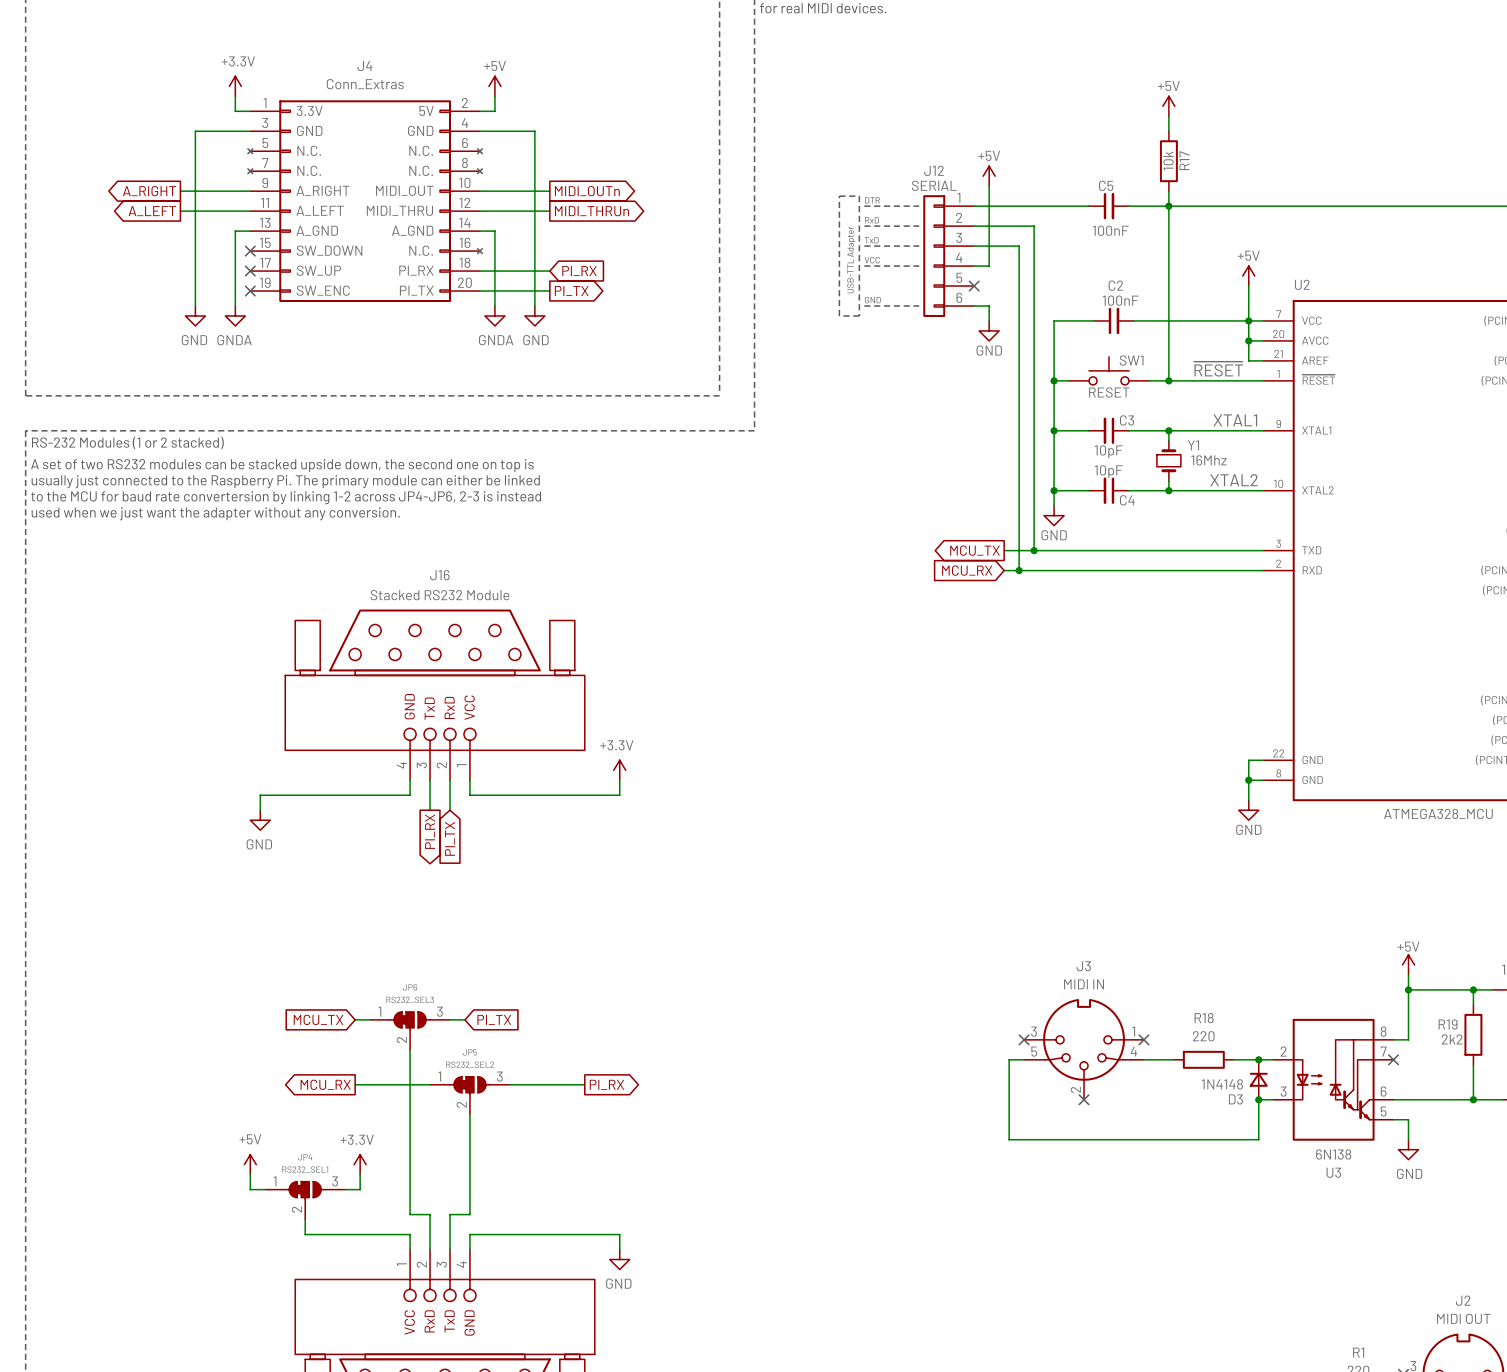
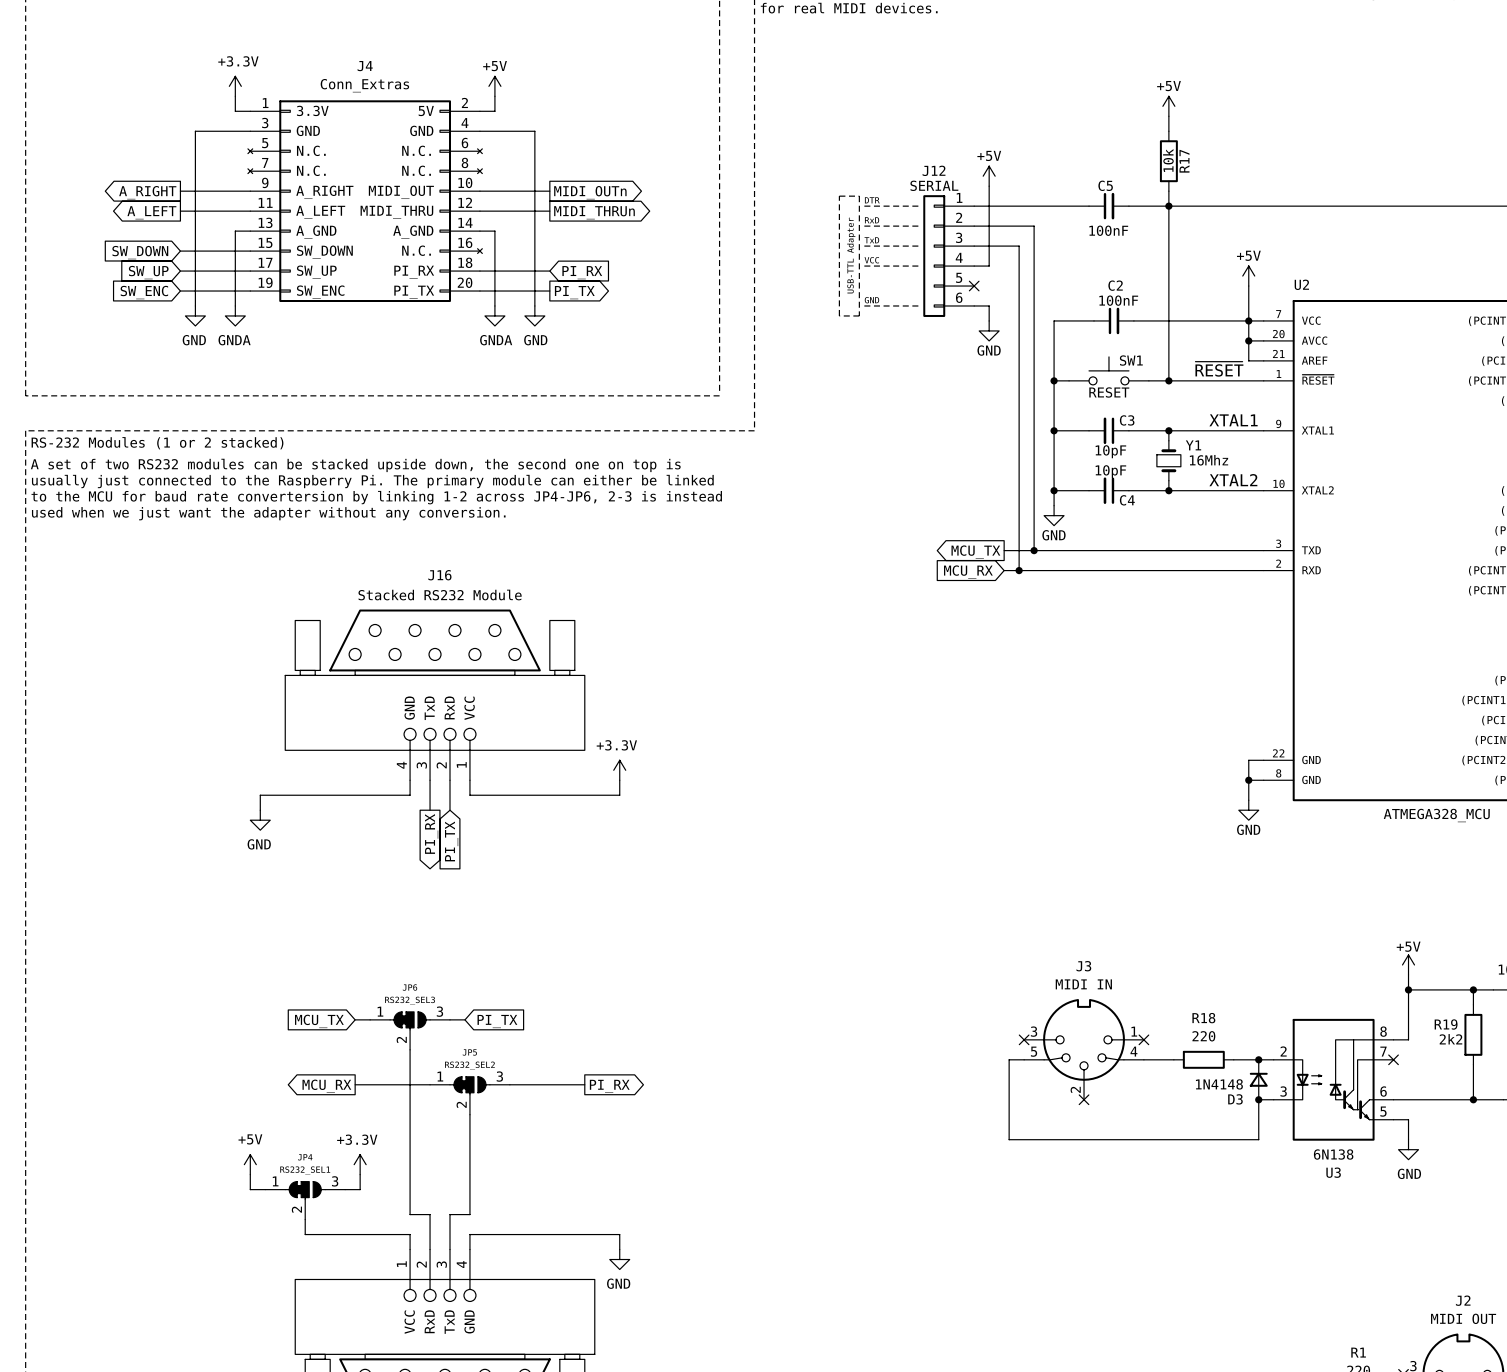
global label: none -> SW_DOWN (140, 252)
wire: none -> (180, 251) (250, 251)
no-connect mark: (250, 251) -> none
global label: none -> SW_UP (148, 272)
wire: none -> (180, 271) (250, 271)
no-connect mark: (250, 271) -> none
global label: none -> SW_ENC (144, 292)
wire: none -> (180, 291) (250, 291)
no-connect mark: (250, 291) -> none

